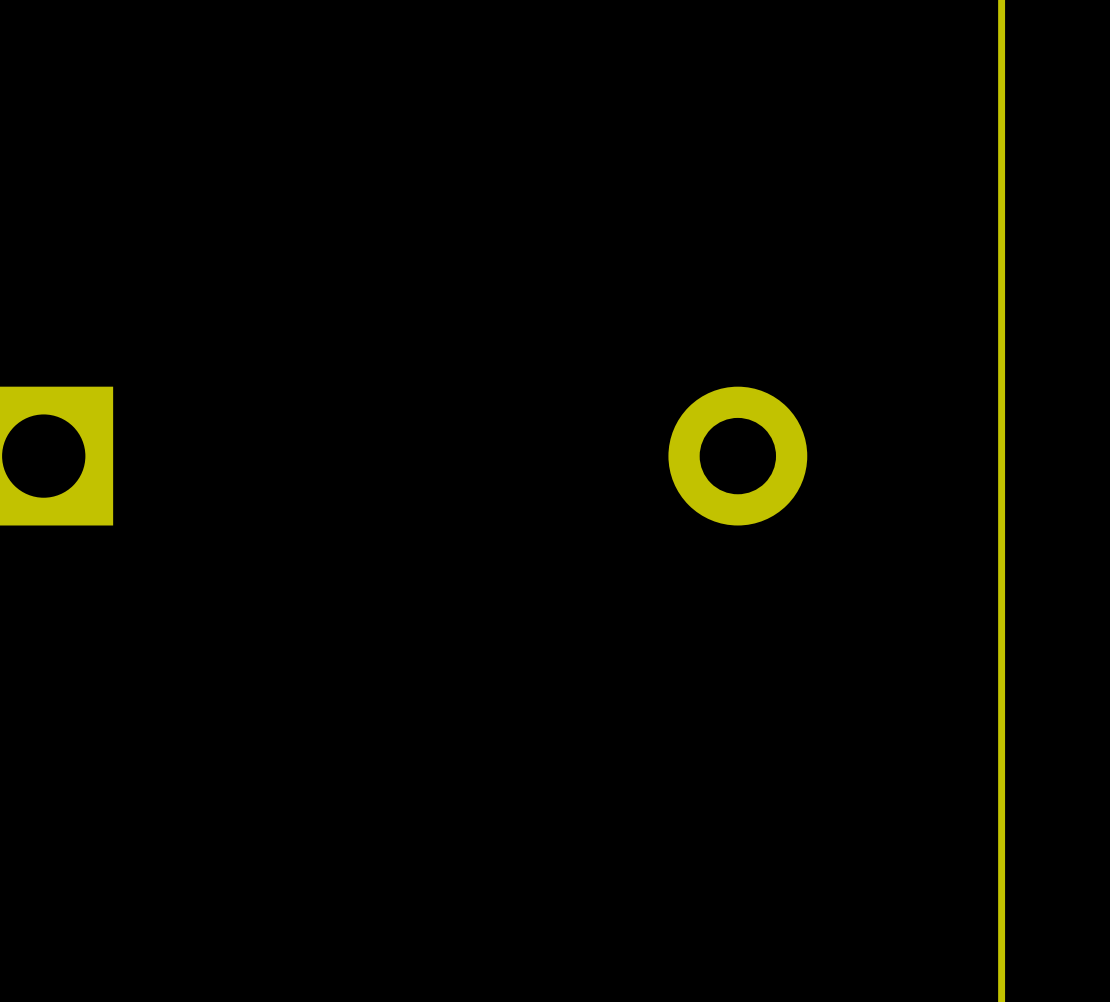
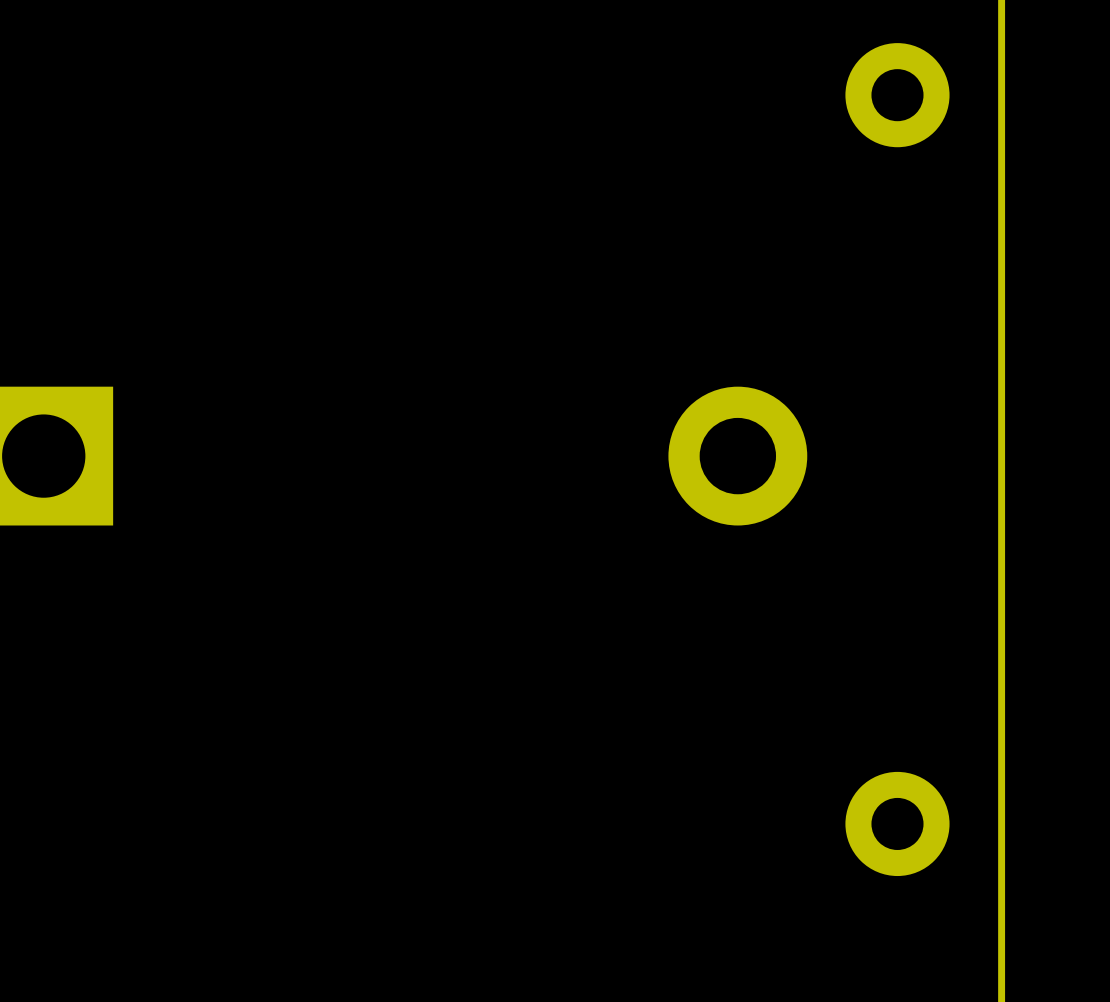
part: none -> (897, 95)
part: none -> (897, 823)

